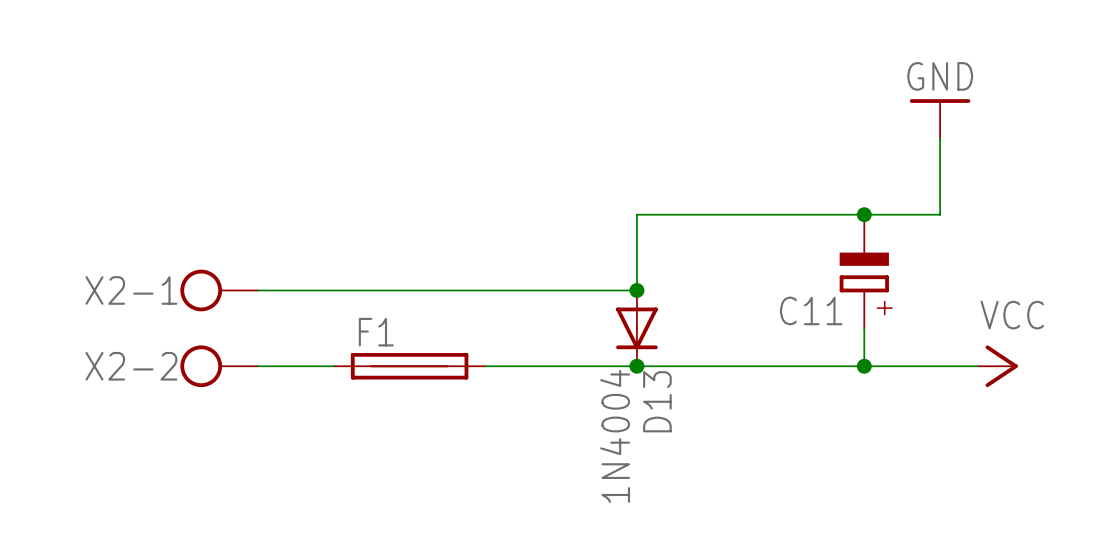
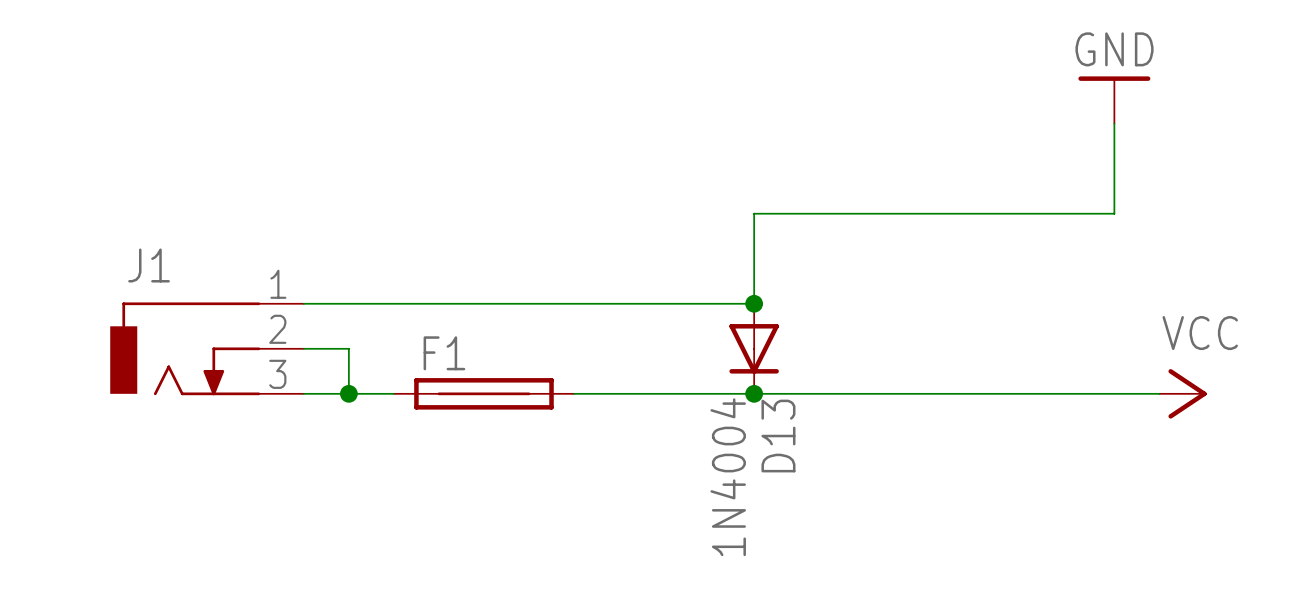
junction: (864, 214) -> none
C11: (864, 271) -> none
X2-1: (219, 290) -> none
J1: none -> (207, 348)
wire: none -> (303, 348) (348, 348) (348, 393)
wire: (864, 328) (864, 366) -> none
X2-2: (219, 366) -> none
junction: none -> (348, 393)
junction: (864, 366) -> none

